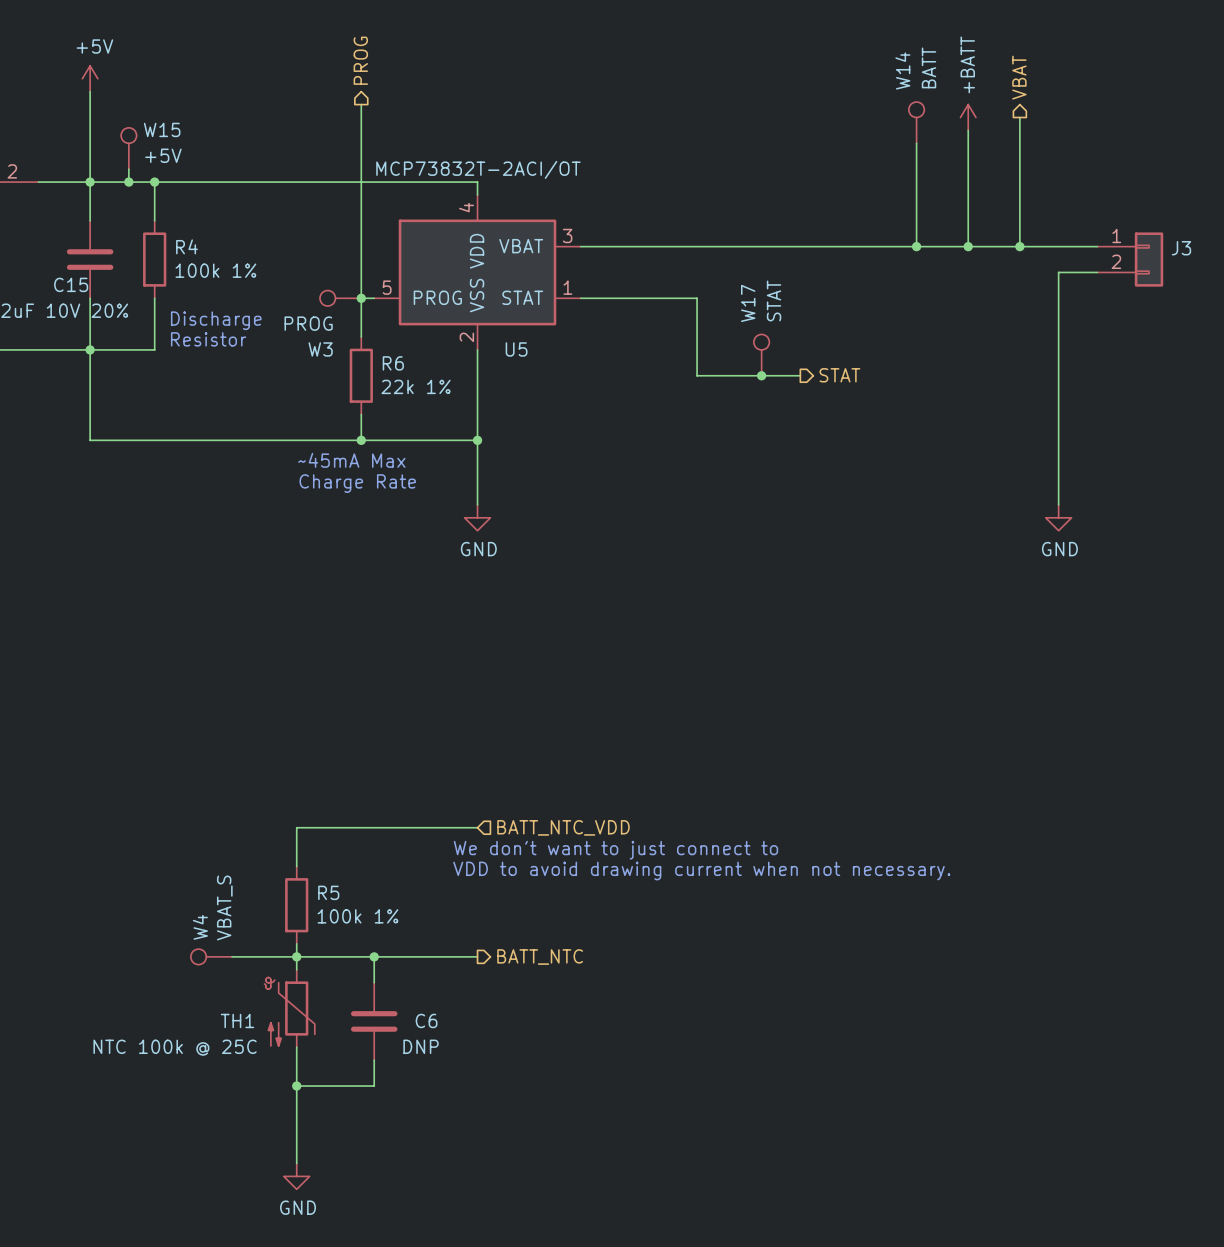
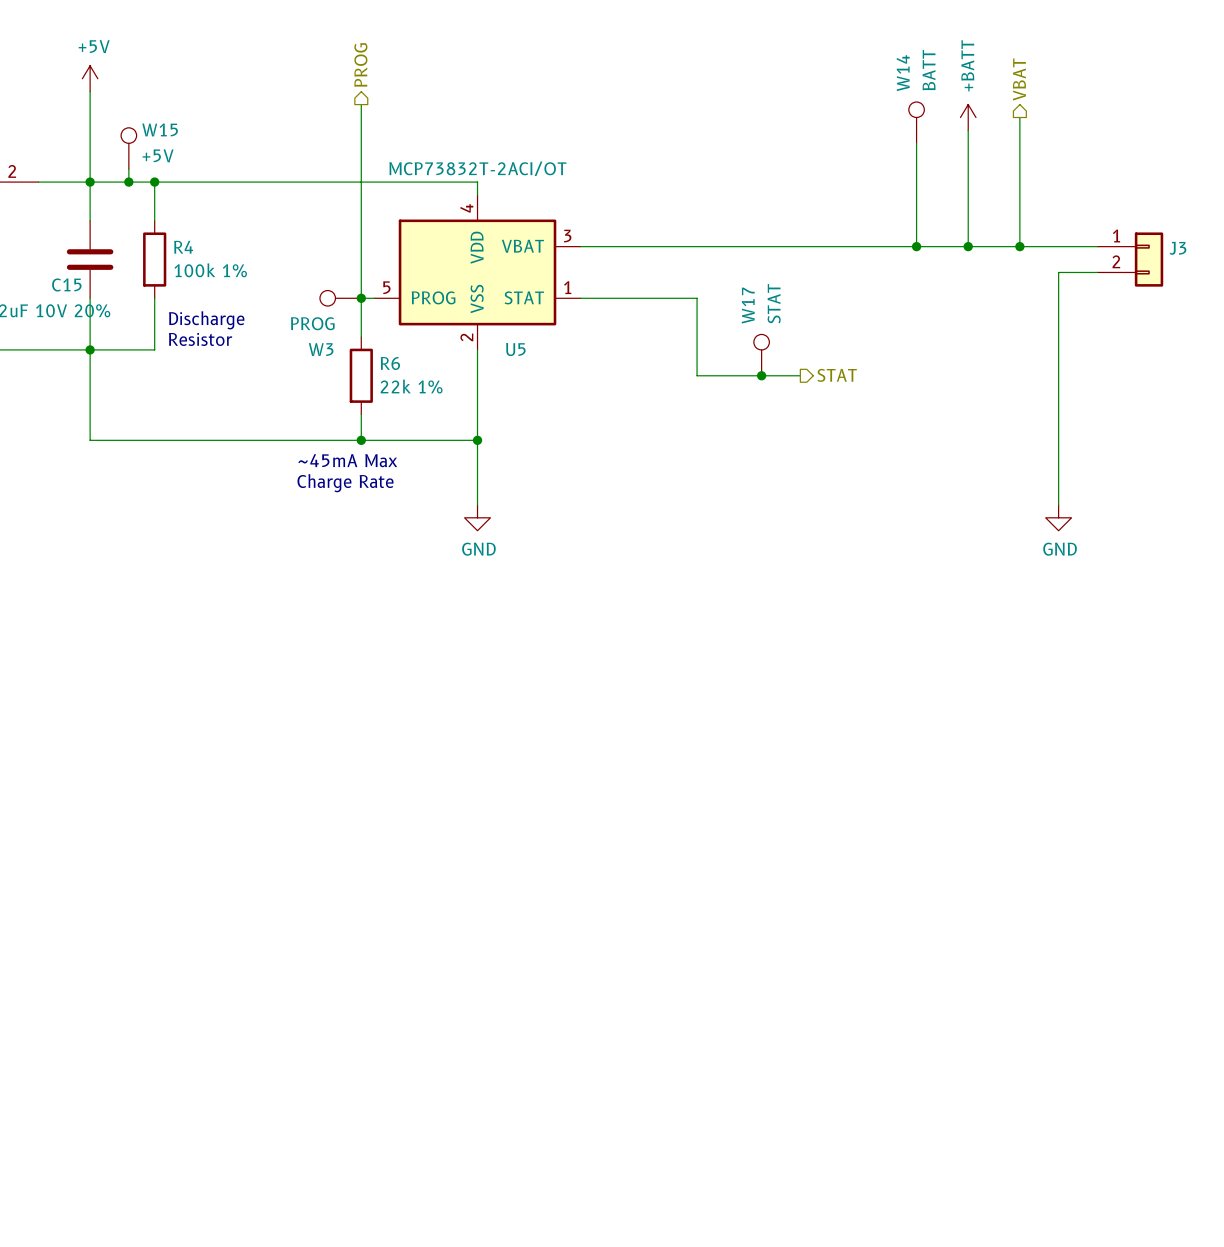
wire: (477, 827) (296, 827) (296, 866) -> none
hierarchical label: BATT_NTC_VDD (563, 827) -> none
text: We don't want to just connect to (615, 850) -> none
text: VDD to avoid drawing current when not necessary. (701, 870) -> none
R5: 100k 1% (296, 905) -> none
wire: (296, 943) (296, 969) -> none
W4: VBAT_S (211, 956) -> none
wire: (232, 956) (477, 956) -> none
junction: (296, 956) -> none
wire: (374, 956) (374, 982) -> none
junction: (374, 956) -> none
hierarchical label: BATT_NTC (540, 957) -> none
TH1: NTC 100k @ 25C (289, 1008) -> none
C6: DNP (374, 1021) -> none
wire: (296, 1047) (296, 1163) -> none
wire: (374, 1060) (374, 1086) (296, 1086) -> none
junction: (296, 1086) -> none
power symbol: GND (296, 1176) -> none

